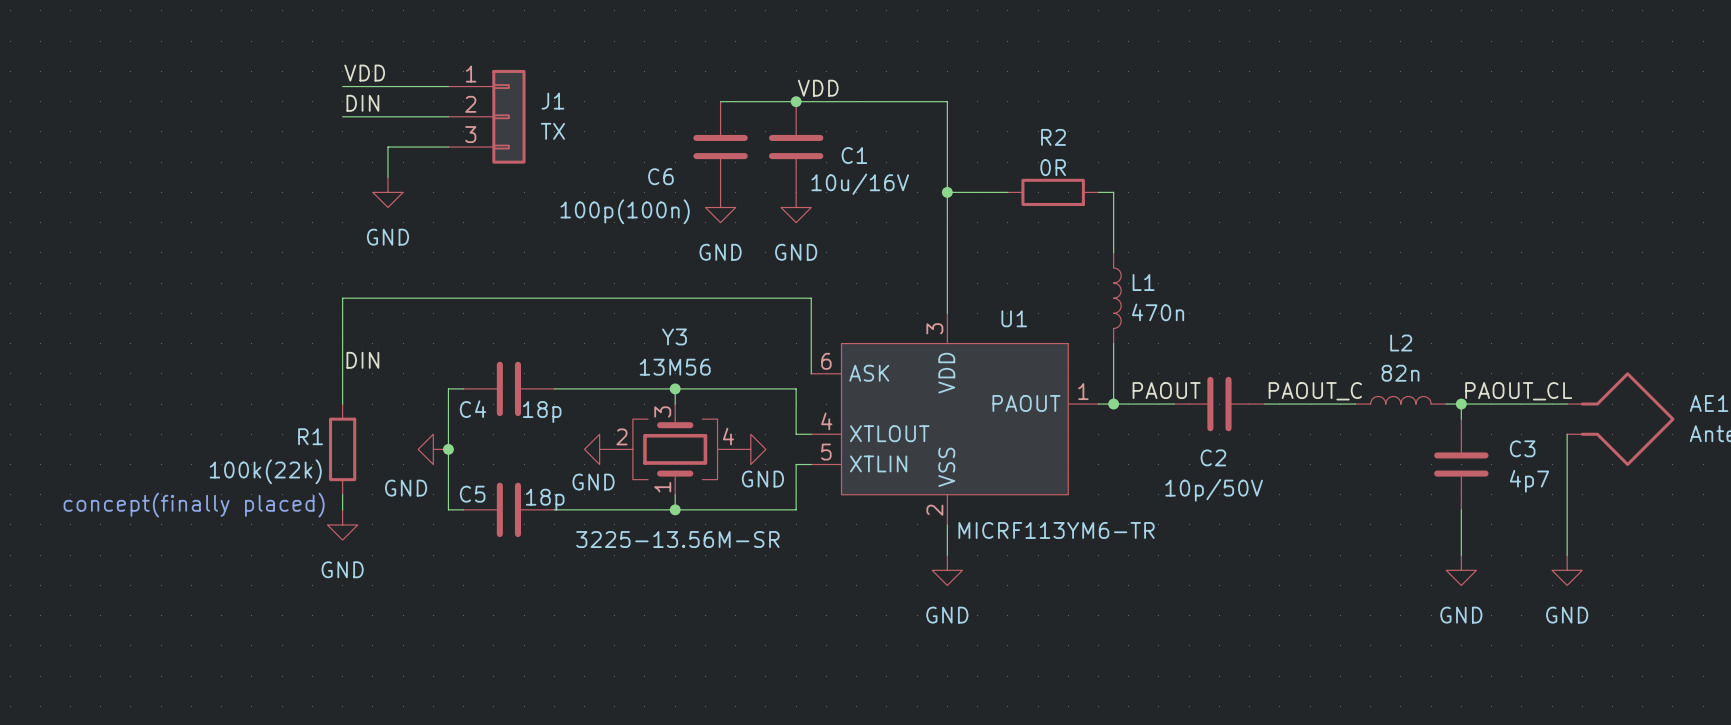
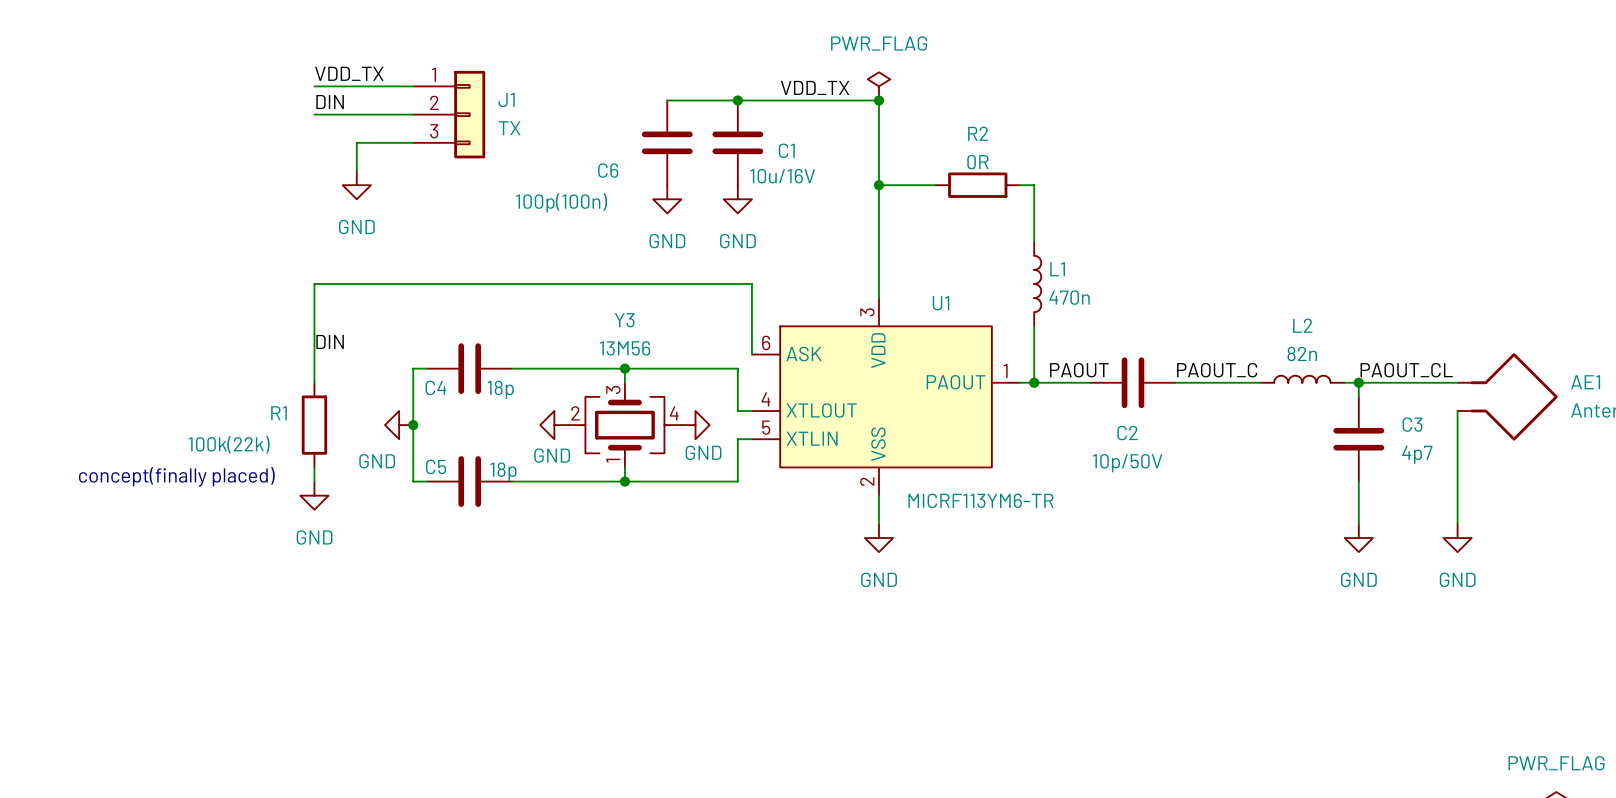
label: VDD (364, 73) -> VDD_TX (349, 73)
power symbol: none -> PWR_FLAG (878, 86)
label: VDD (818, 88) -> VDD_TX (815, 87)
junction: none -> (878, 100)
Y3 text: 3225-13.56M-SR (677, 539) -> none

